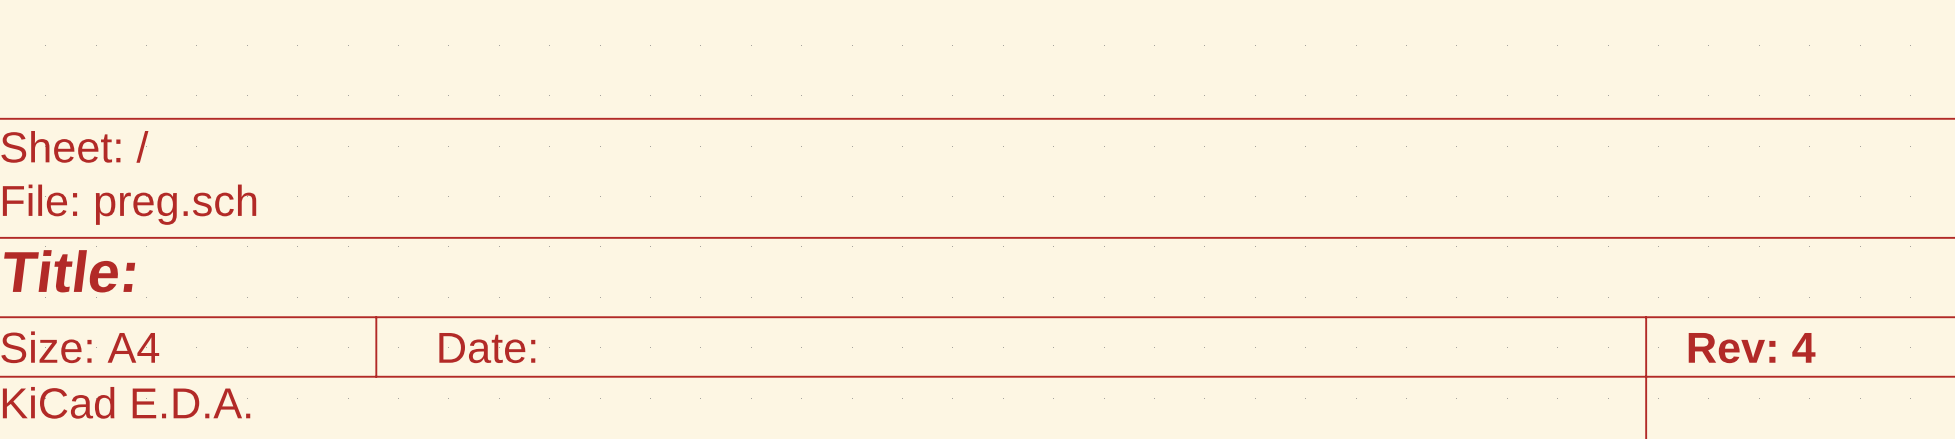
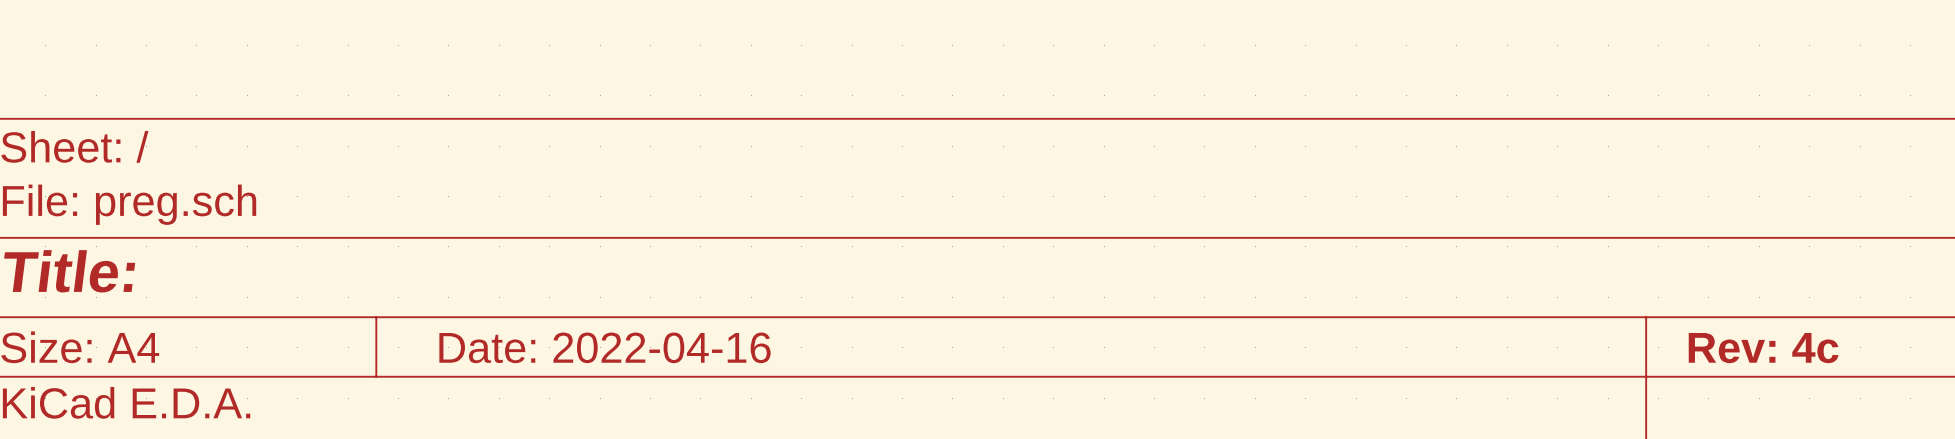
title block: Date: (487, 348) -> Date: 2022-04-16 (605, 347)
title block: Rev: 4 (1752, 348) -> Rev: 4c (1763, 348)

